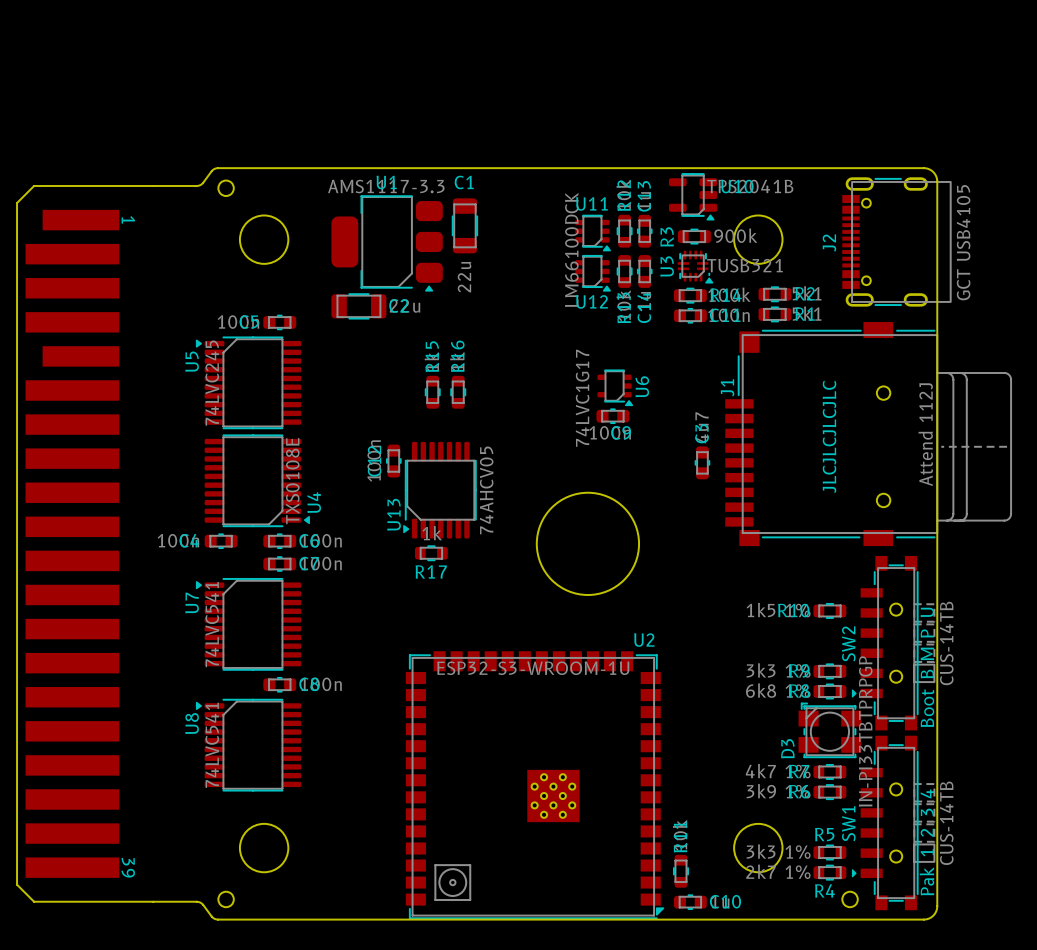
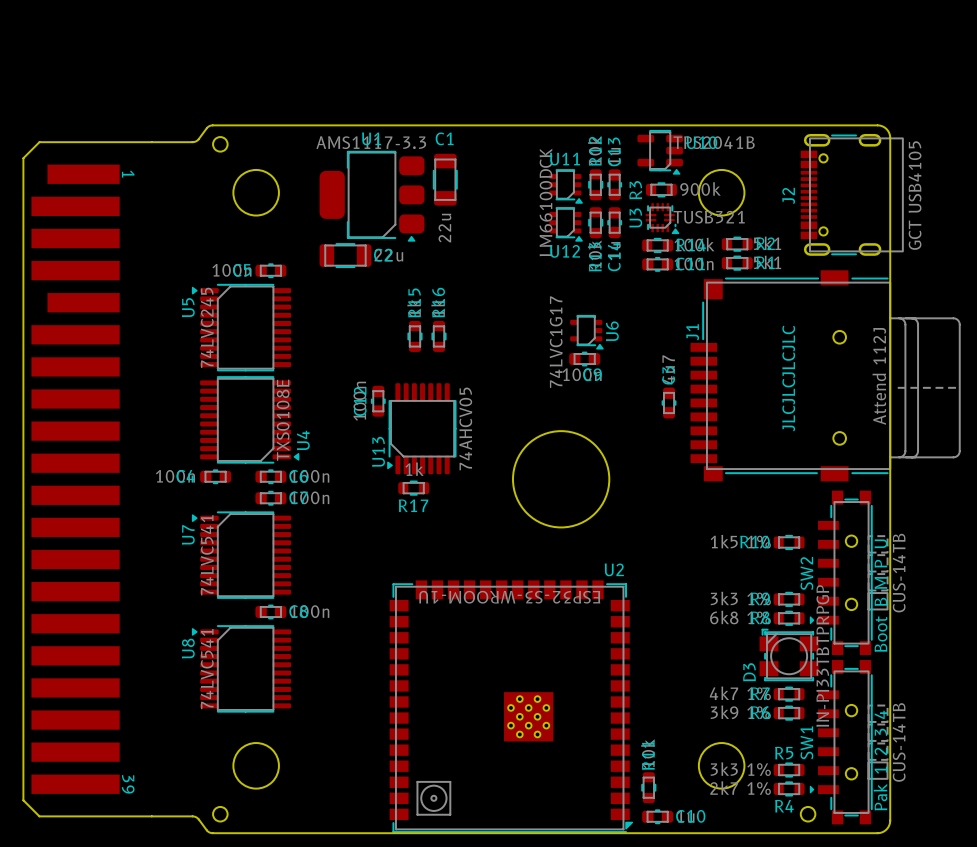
U2 value rotation: 0° (533, 668) -> 180° (509, 597)

